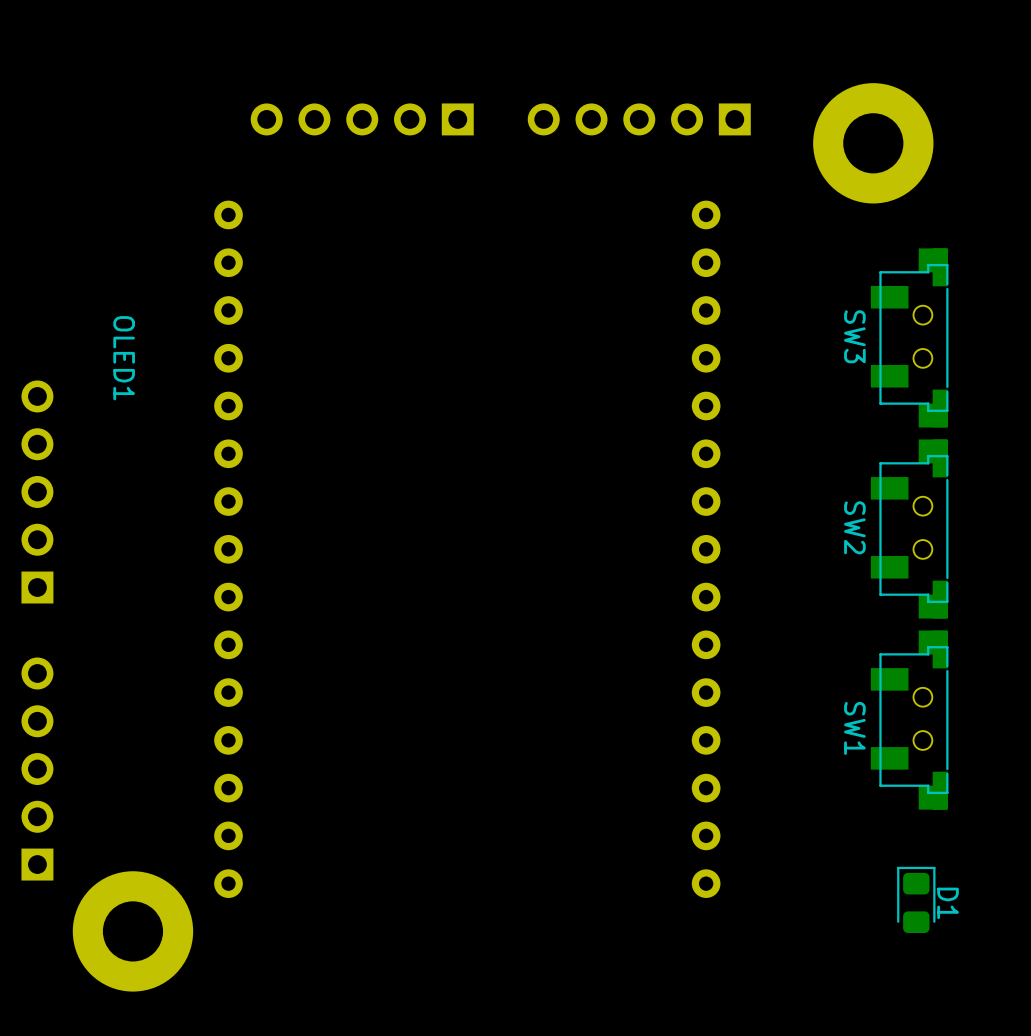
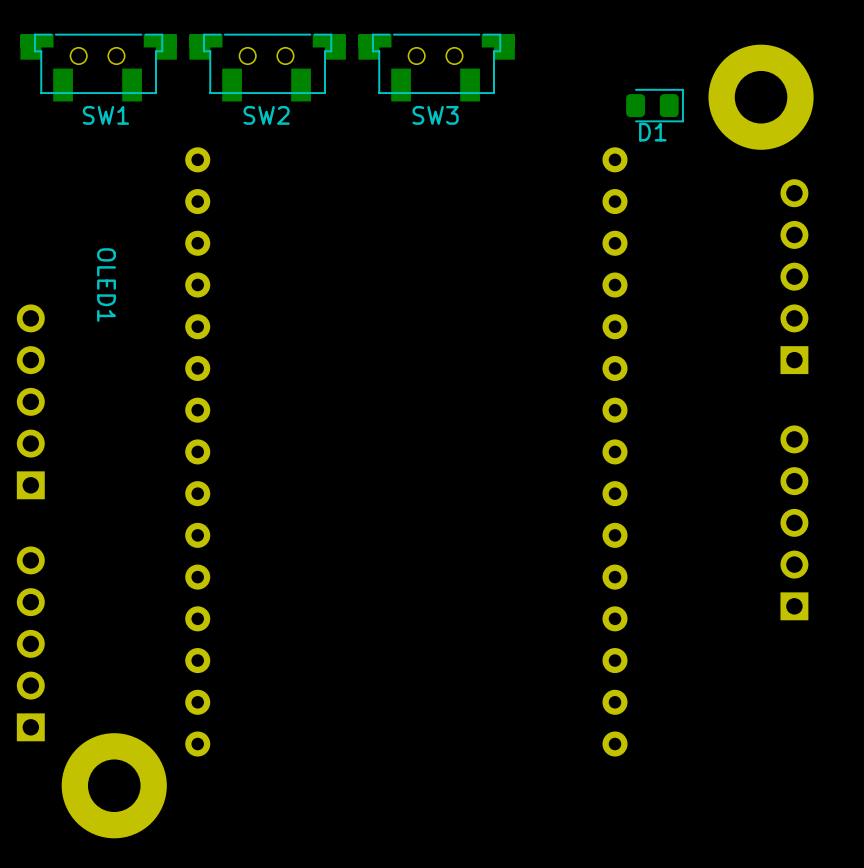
part: (362, 119) -> none
part: (639, 119) -> none
SW3 rotation: 0° (909, 337) -> 90° counterclockwise (436, 67)
SW3 position: (909, 337) -> (436, 67)
part: none -> (794, 276)
SW2 rotation: 0° (909, 529) -> 90° counterclockwise (267, 67)
SW2 position: (909, 529) -> (267, 67)
part: none -> (794, 522)
SW1 rotation: 0° (909, 720) -> 90° counterclockwise (98, 67)
SW1 position: (909, 720) -> (98, 67)
D1 rotation: 0° (916, 899) -> 90° clockwise (655, 105)
D1 position: (916, 899) -> (655, 105)

